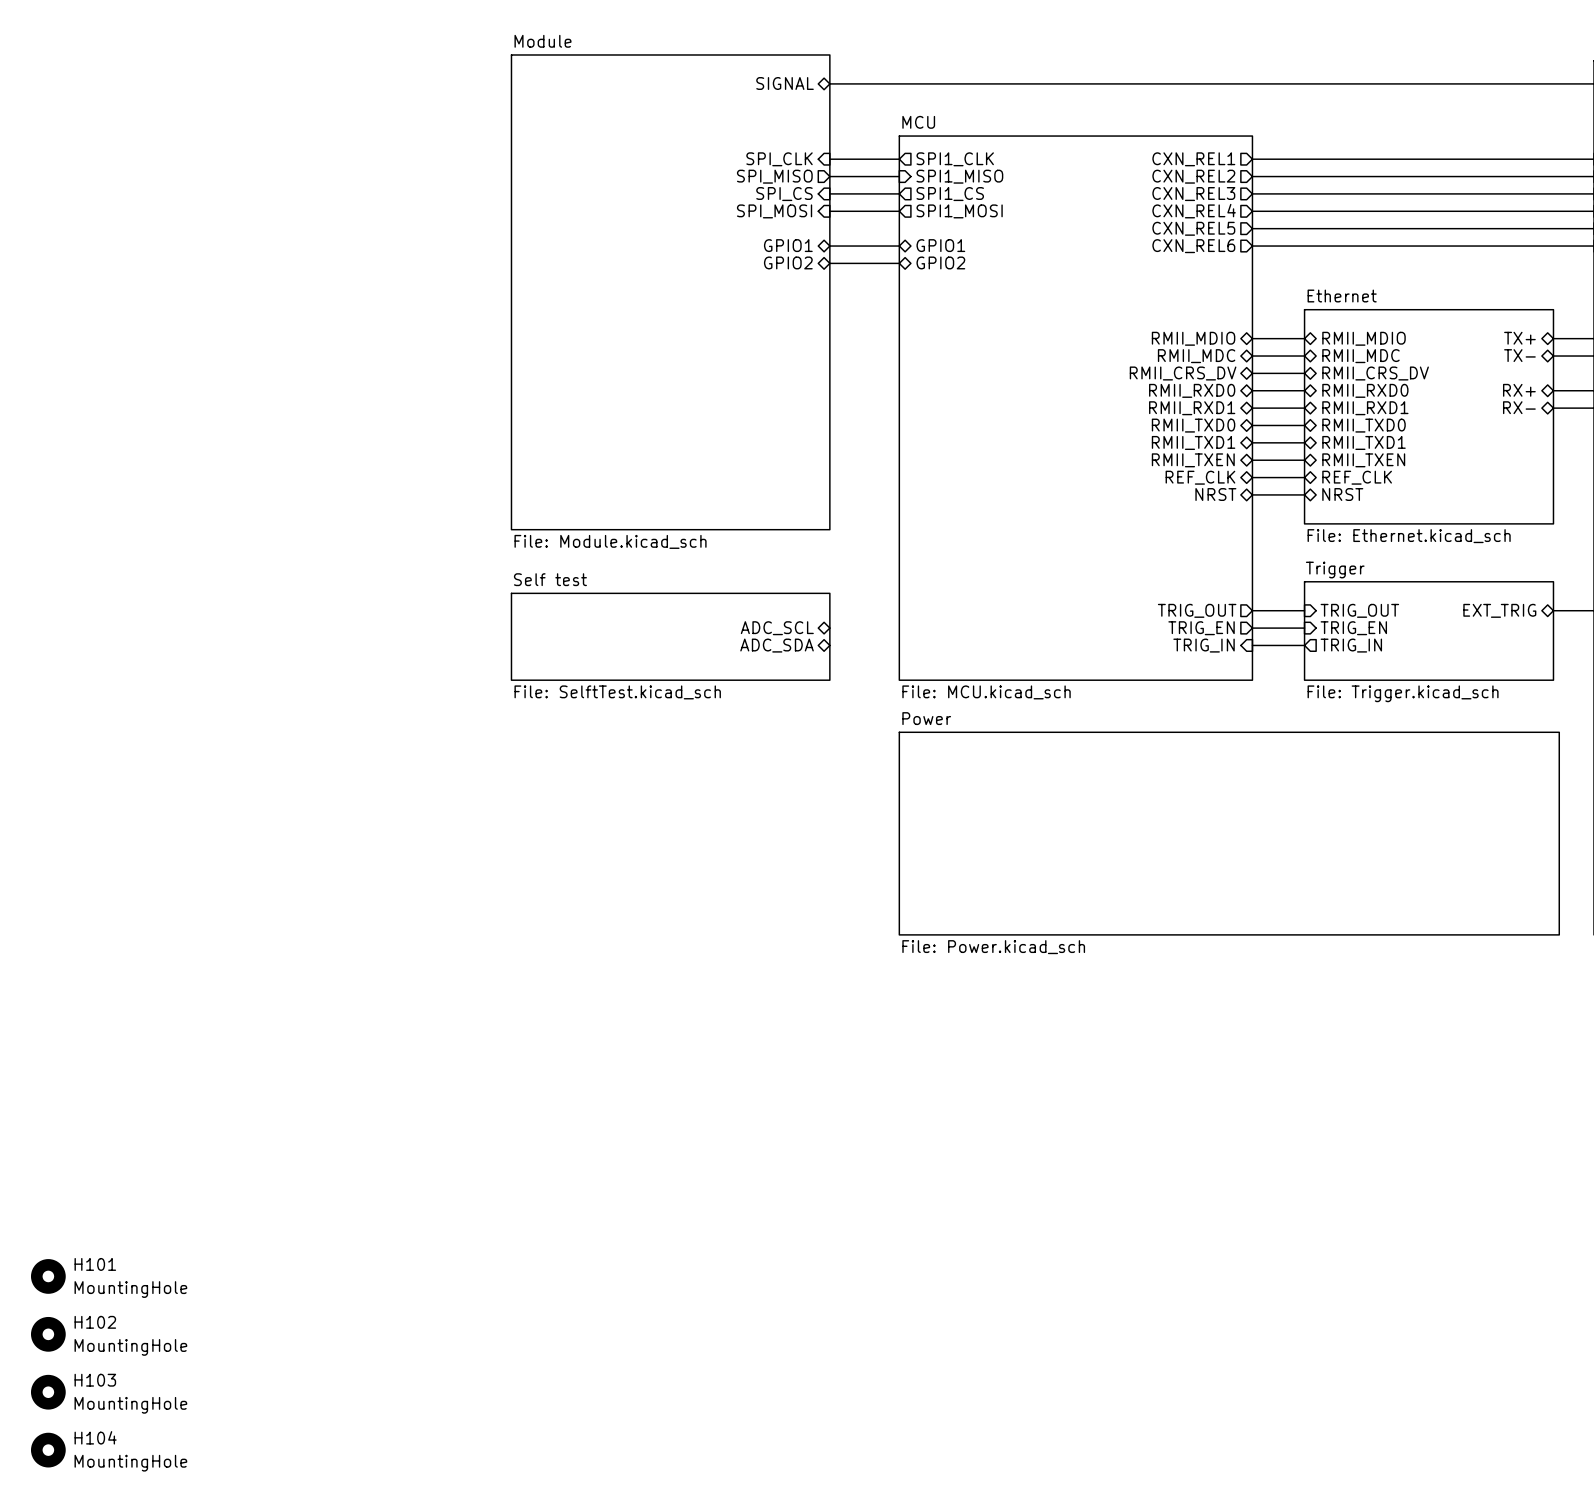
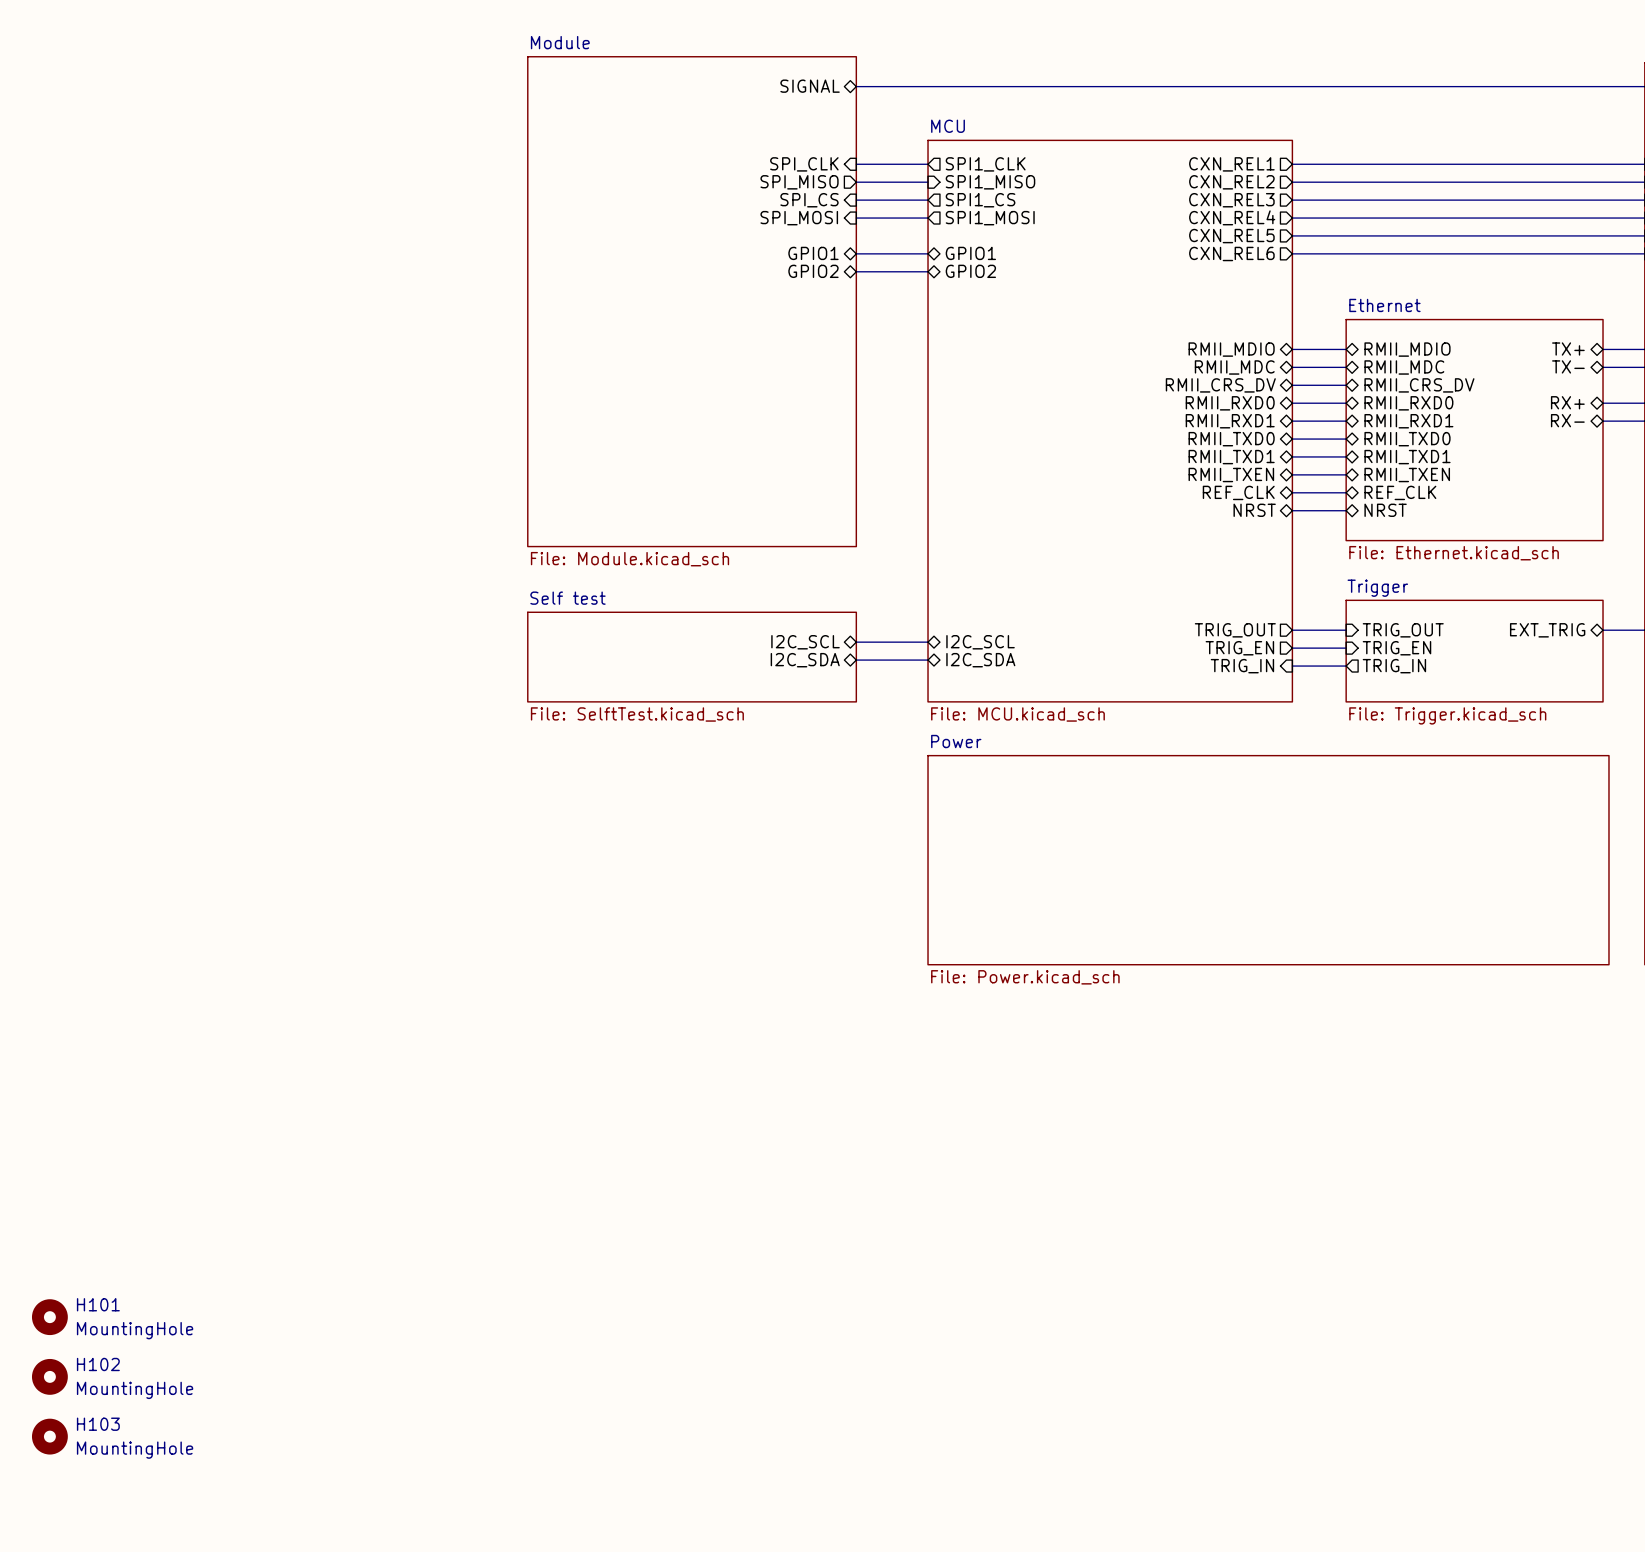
wire: none -> (856, 642) (928, 642)
sheet pin: none -> I2C_SCL (980, 642)
sheet pin: ADC_SCL (777, 628) -> I2C_SCL (805, 642)
wire: none -> (856, 660) (928, 660)
sheet pin: none -> I2C_SDA (980, 660)
sheet pin: ADC_SDA (777, 645) -> I2C_SDA (805, 660)
H104: MountingHole (48, 1450) -> none

